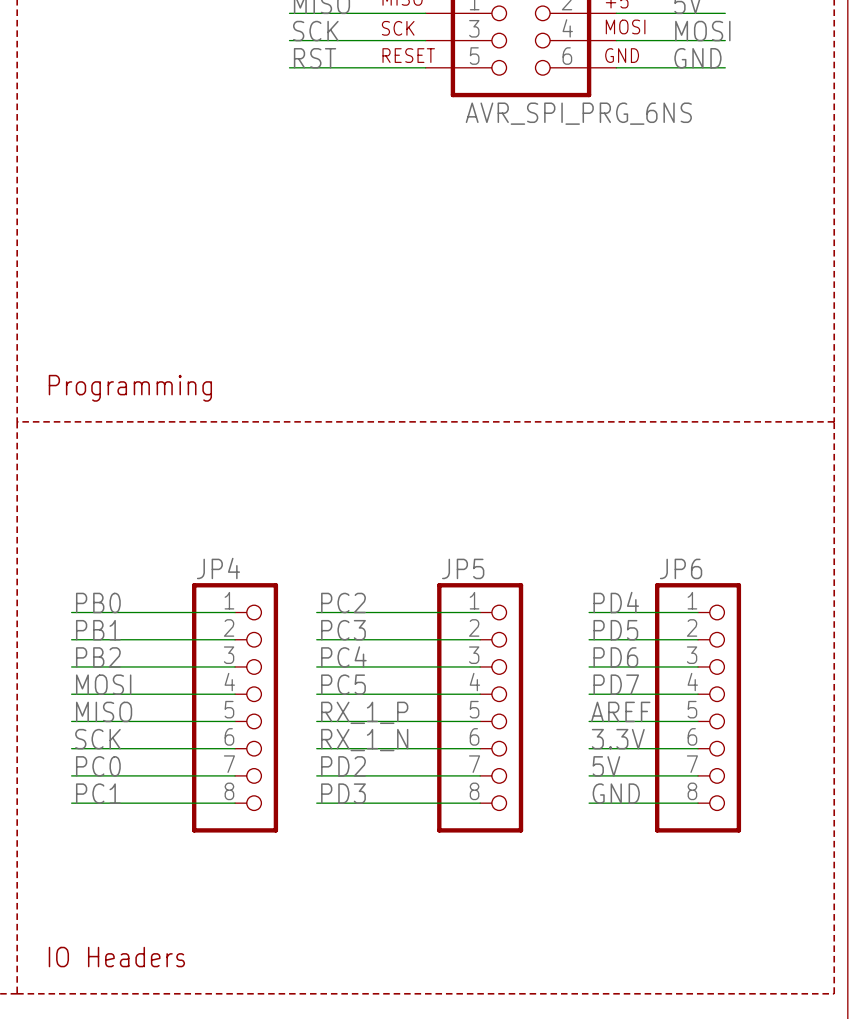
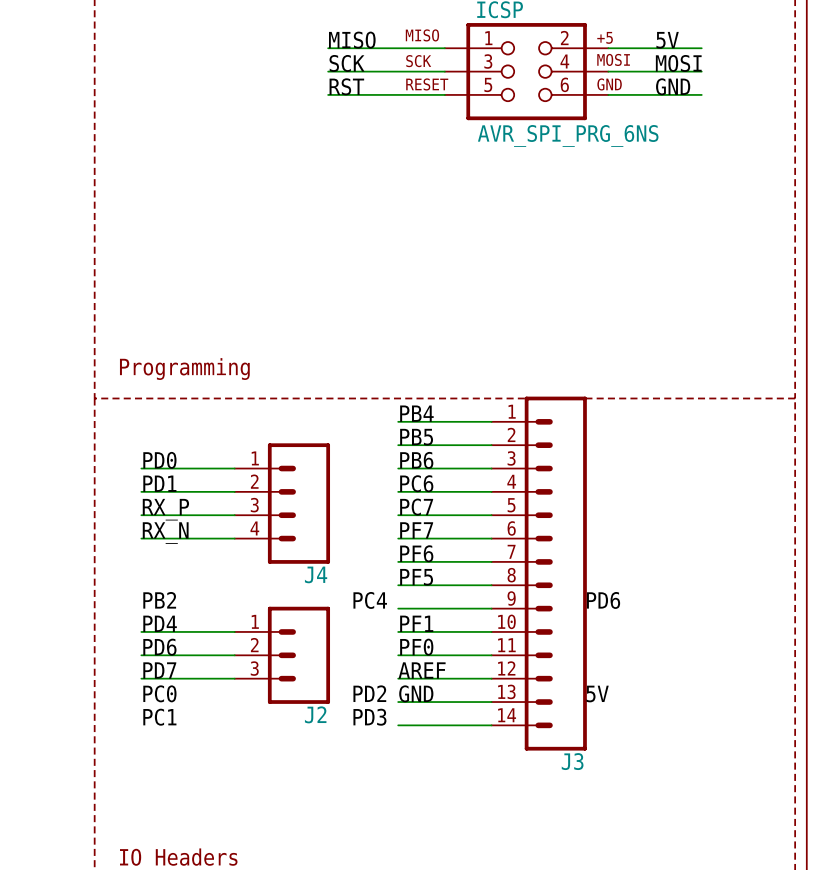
label: none -> PB4 (416, 413)
wire: none -> (398, 421) (491, 421)
label: none -> PB5 (416, 437)
label: none -> PD0 (159, 460)
label: none -> PB6 (416, 460)
wire: none -> (141, 468) (234, 468)
label: none -> PD1 (159, 483)
label: none -> PC6 (416, 483)
wire: none -> (141, 491) (234, 491)
J4: none -> (282, 503)
label: none -> PC7 (416, 507)
label: none -> RX_P (165, 509)
wire: none -> (141, 515) (234, 515)
label: none -> PF7 (416, 530)
label: none -> RX_N (165, 533)
wire: none -> (141, 538) (234, 538)
label: PB0 (98, 602) -> none
label: PC2 (343, 602) -> none
label: none -> PF6 (416, 553)
label: PD4 (616, 602) -> none
wire: (71, 612) (235, 612) -> none
wire: (316, 612) (371, 612) -> none
wire: (589, 612) (698, 612) -> (398, 445) (491, 445)
J3: none -> (539, 573)
label: PB1 (98, 630) -> none
label: PC3 (343, 630) -> none
label: none -> PF5 (416, 577)
label: PD5 (615, 630) -> none
wire: (71, 639) (235, 639) -> none
wire: (316, 639) (371, 639) -> none
wire: (589, 639) (698, 639) -> (398, 468) (491, 468)
wire: (71, 666) (235, 666) -> none
wire: (316, 666) (371, 666) -> none
wire: (589, 666) (698, 666) -> (398, 491) (491, 491)
label: MOSI (103, 684) -> PD4 (160, 623)
label: PC5 (343, 684) -> none
label: none -> PF1 (416, 623)
label: PD7 (616, 684) -> none
wire: (316, 694) (371, 694) -> none
wire: (589, 694) (698, 694) -> (398, 515) (491, 515)
JP4: (235, 707) -> none
JP5: (480, 707) -> none
JP6: (698, 707) -> none
label: MISO (104, 711) -> PD6 (159, 647)
label: none -> PF0 (416, 647)
label position: AREF (620, 711) -> AREF (422, 670)
label: RX_1_P (364, 712) -> none
J2: none -> (282, 655)
wire: (316, 721) (371, 721) -> none
wire: (589, 721) (698, 721) -> (398, 538) (491, 538)
label: SCK (97, 739) -> PD7 (159, 670)
label: 3.3V (618, 739) -> none
label: RX_1_N (364, 740) -> none
wire: (316, 748) (371, 748) -> none
wire: (589, 748) (698, 748) -> none
wire: (71, 775) (235, 775) -> none
wire: (316, 775) (371, 775) -> none
wire: (589, 775) (698, 775) -> none
label position: GND (616, 793) -> GND (416, 693)
wire: (71, 803) (235, 803) -> none
wire: (316, 803) (371, 803) -> none
wire: (589, 803) (698, 803) -> none

